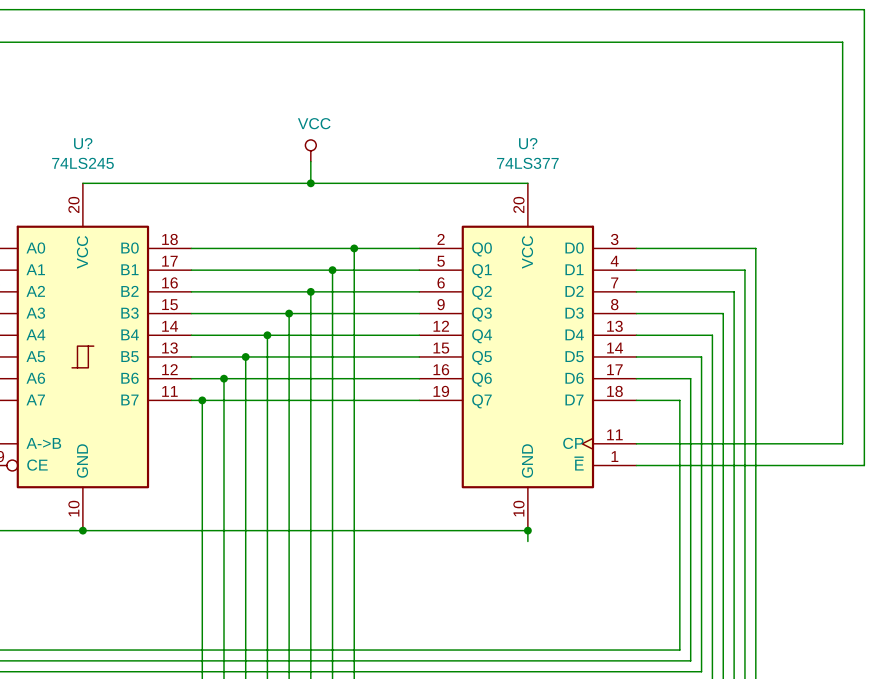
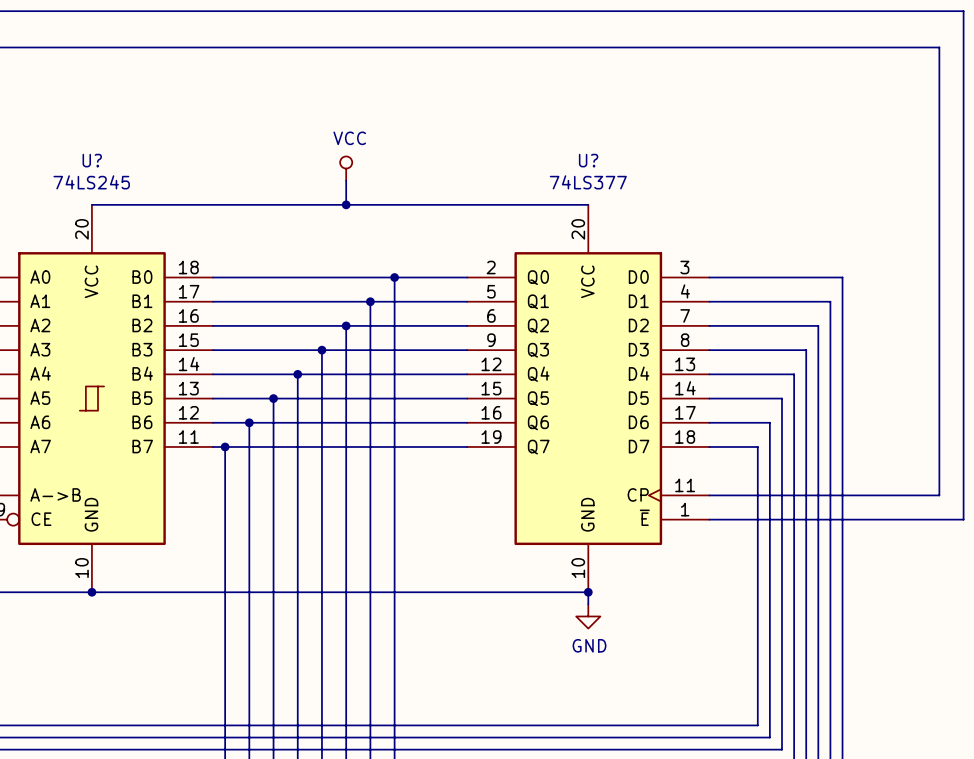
power symbol: none -> GND (588, 616)

